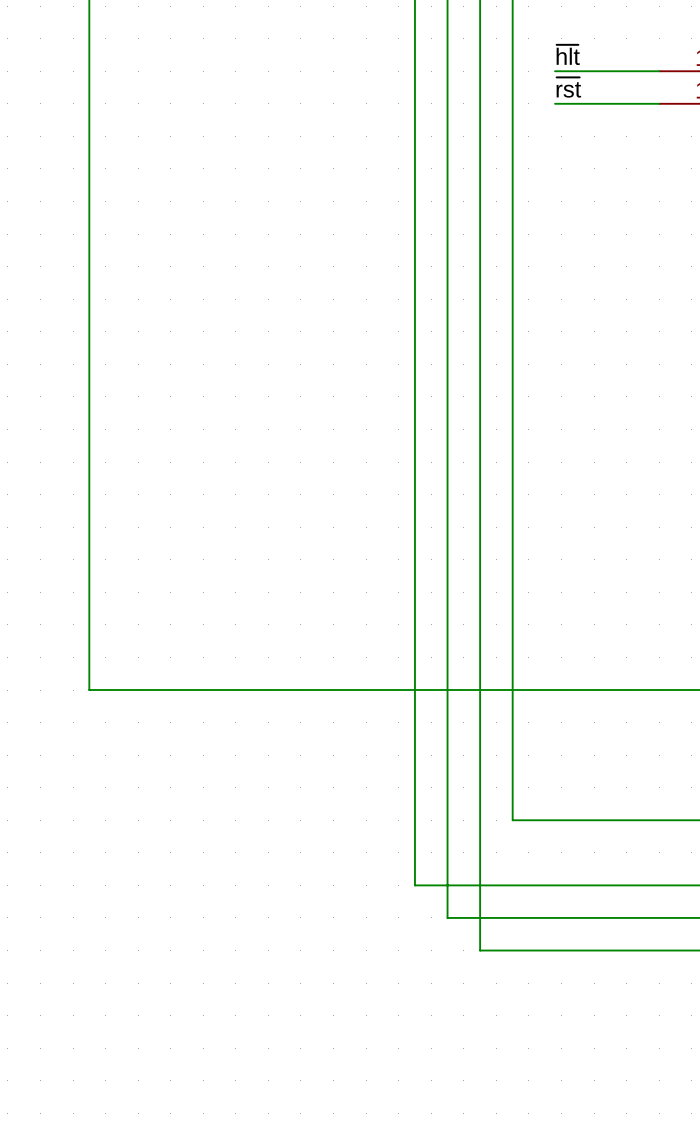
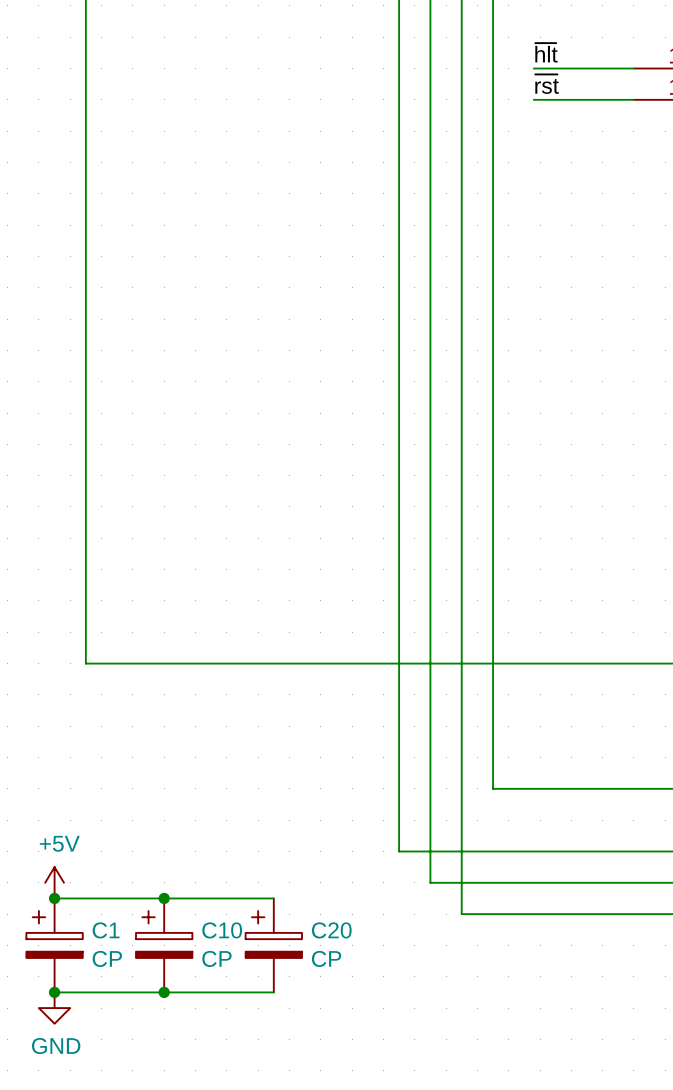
power symbol: none -> +5V (54, 882)
wire: none -> (54, 898) (273, 898)
junction: none -> (54, 898)
junction: none -> (164, 898)
C1: none -> CP (54, 945)
C10: none -> CP (164, 945)
C20: none -> CP (273, 945)
wire: none -> (54, 992) (273, 992)
junction: none -> (54, 992)
junction: none -> (164, 992)
power symbol: none -> GND (54, 1008)

